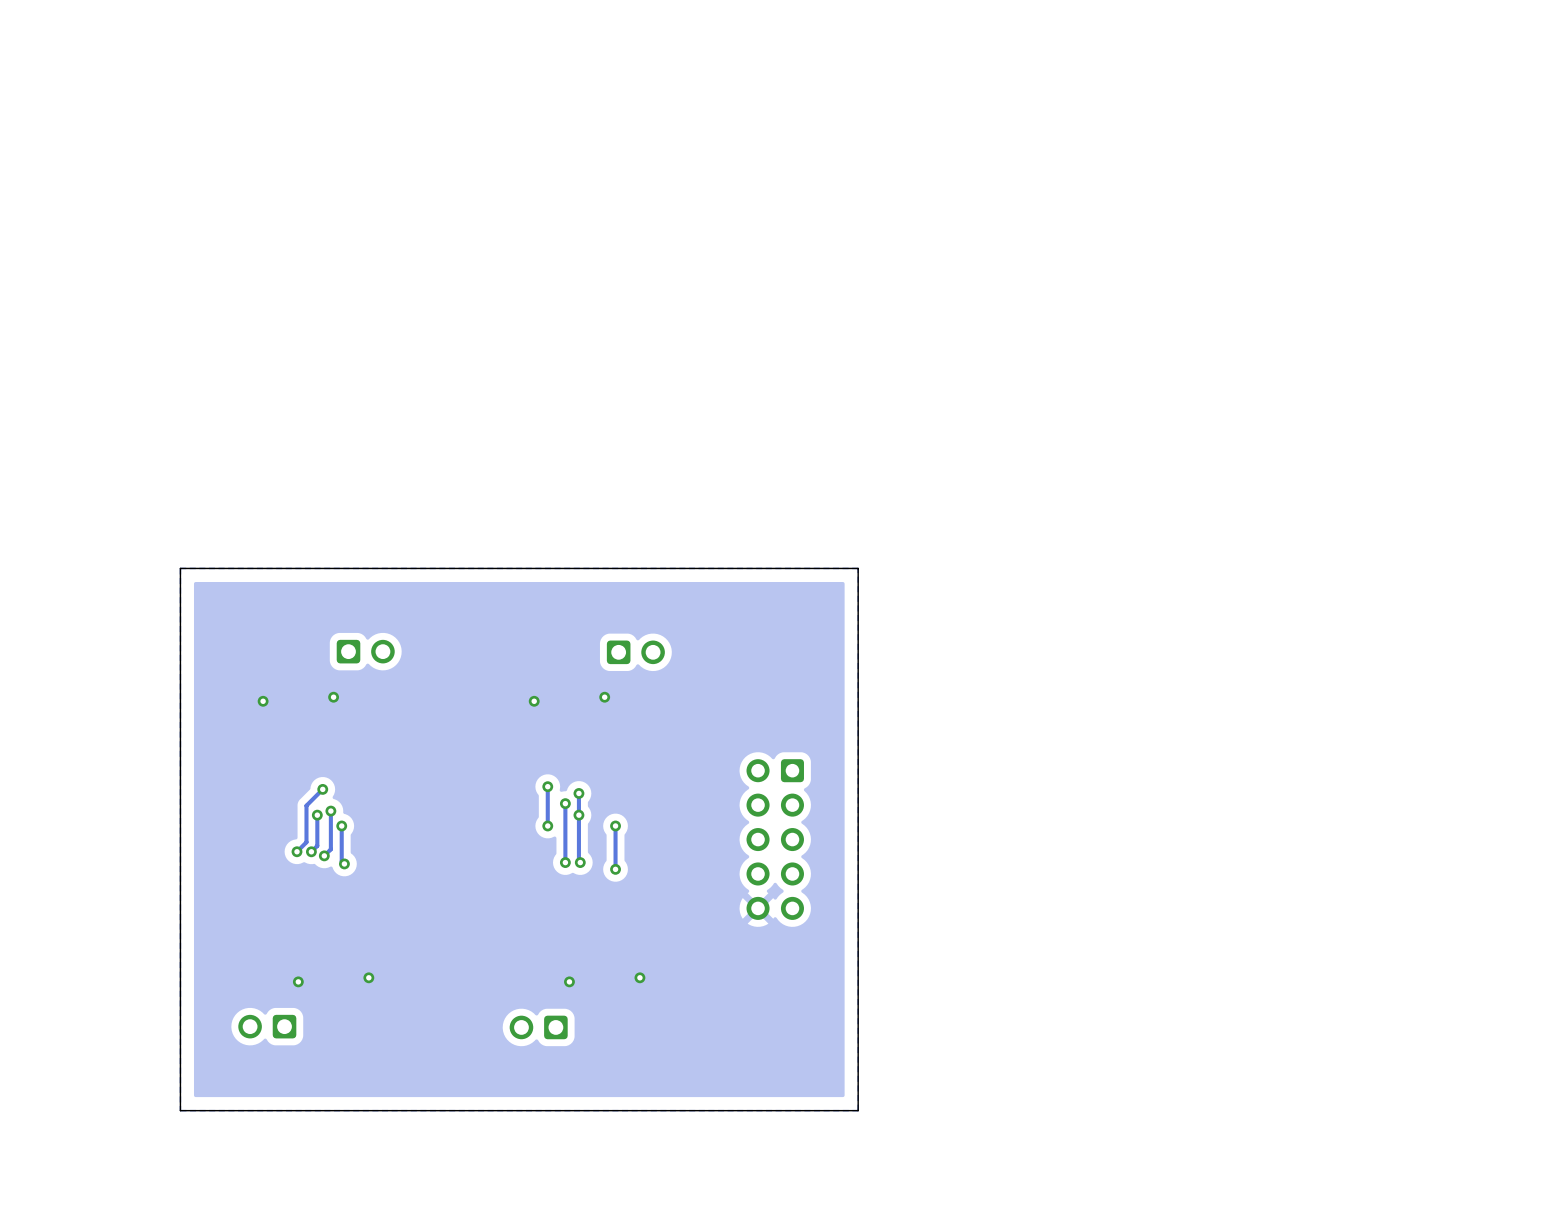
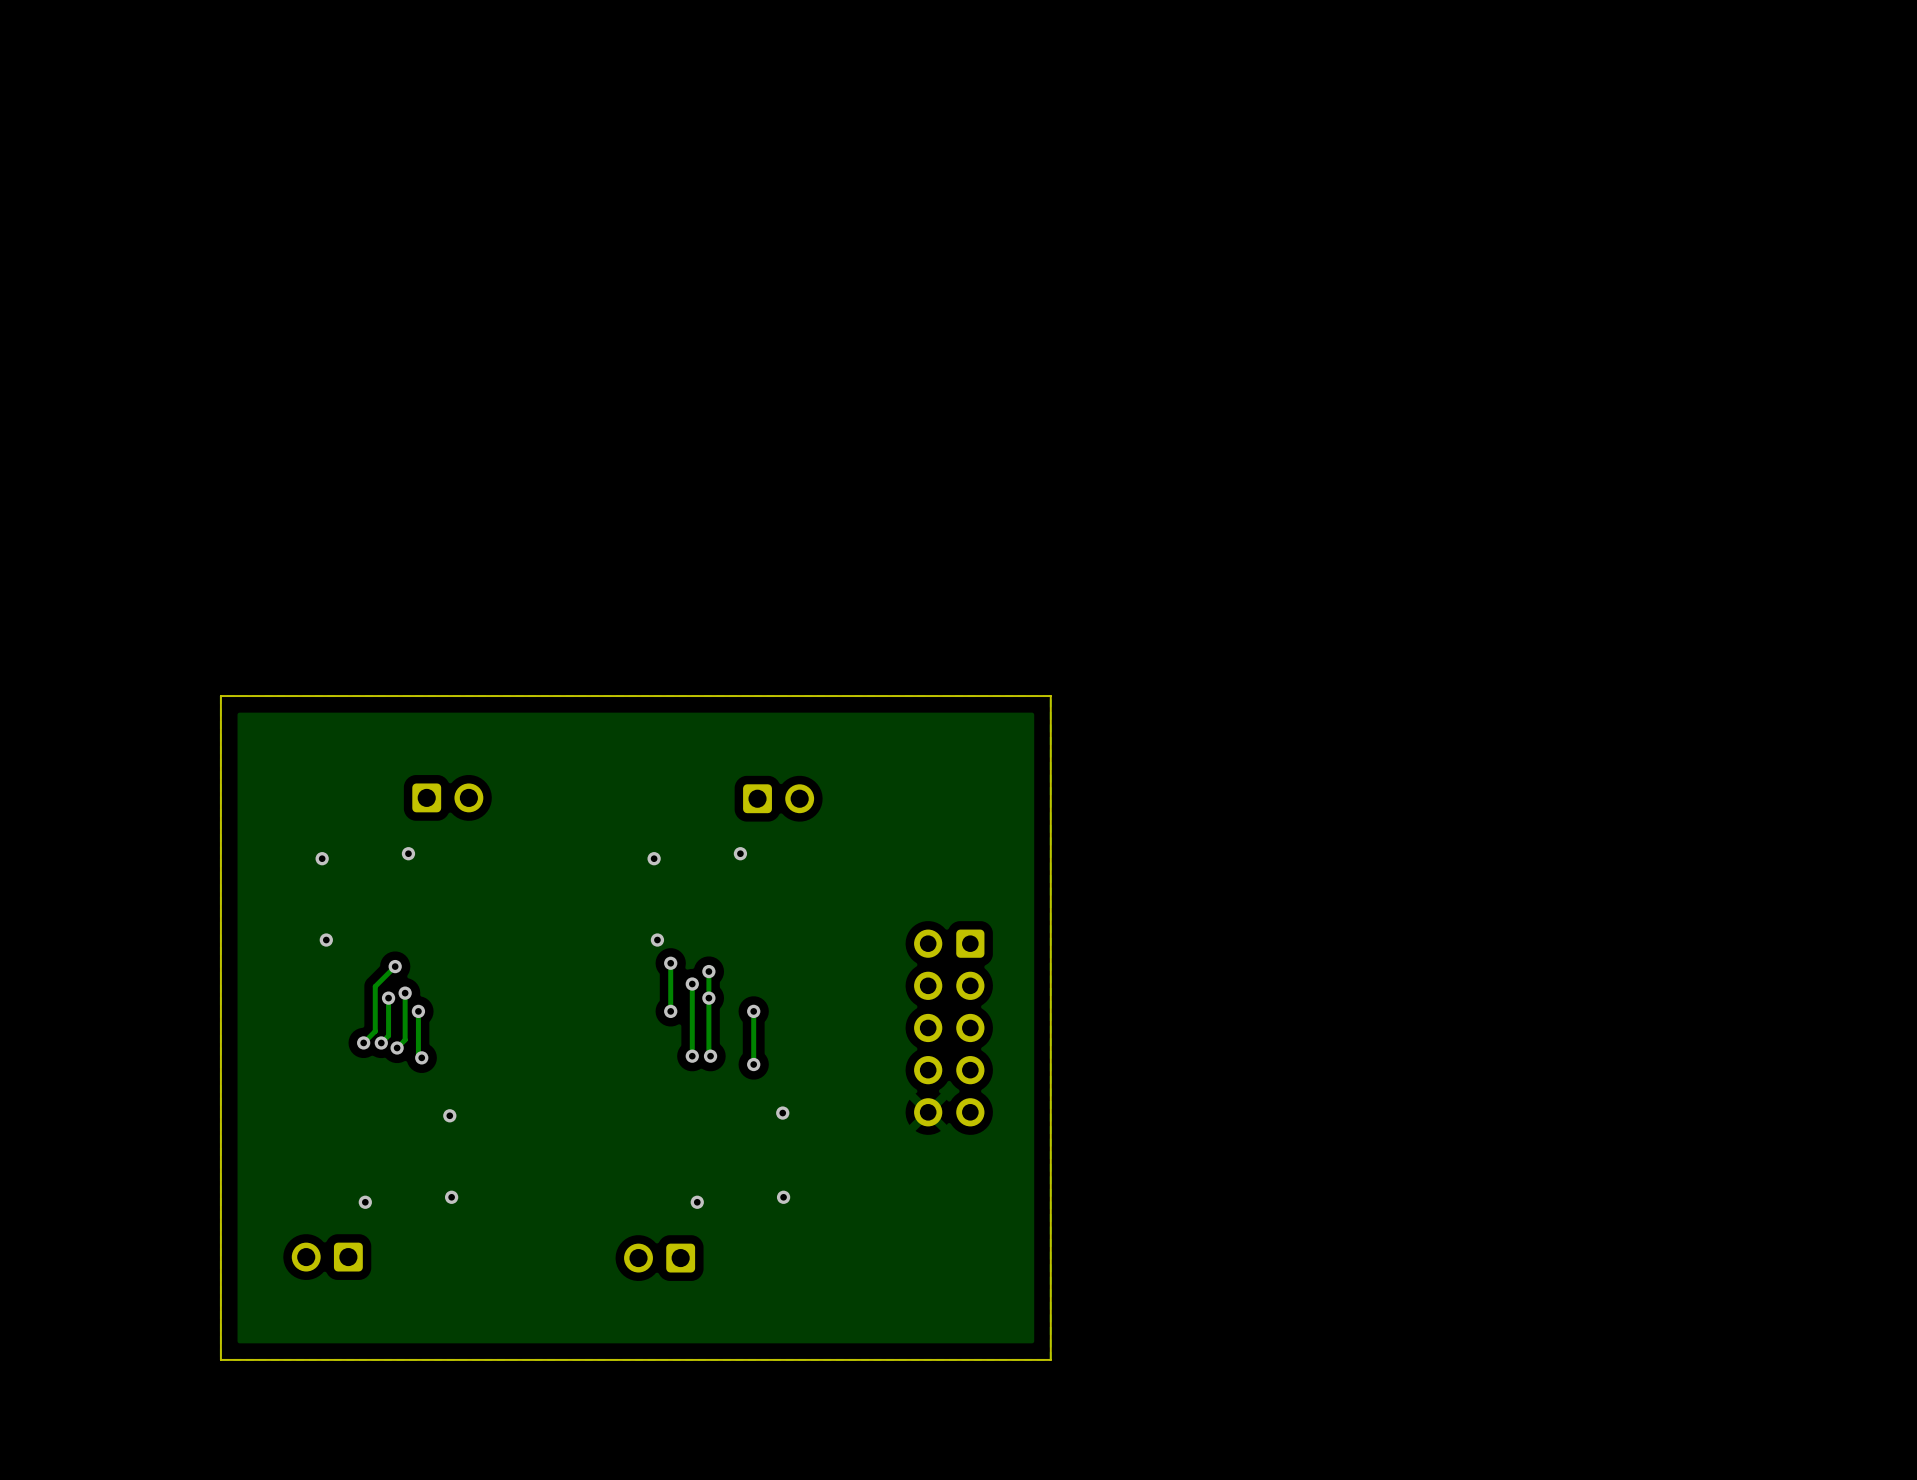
via: none -> (326, 940)
via: none -> (657, 940)
via: none -> (782, 1113)
via: none -> (449, 1115)

